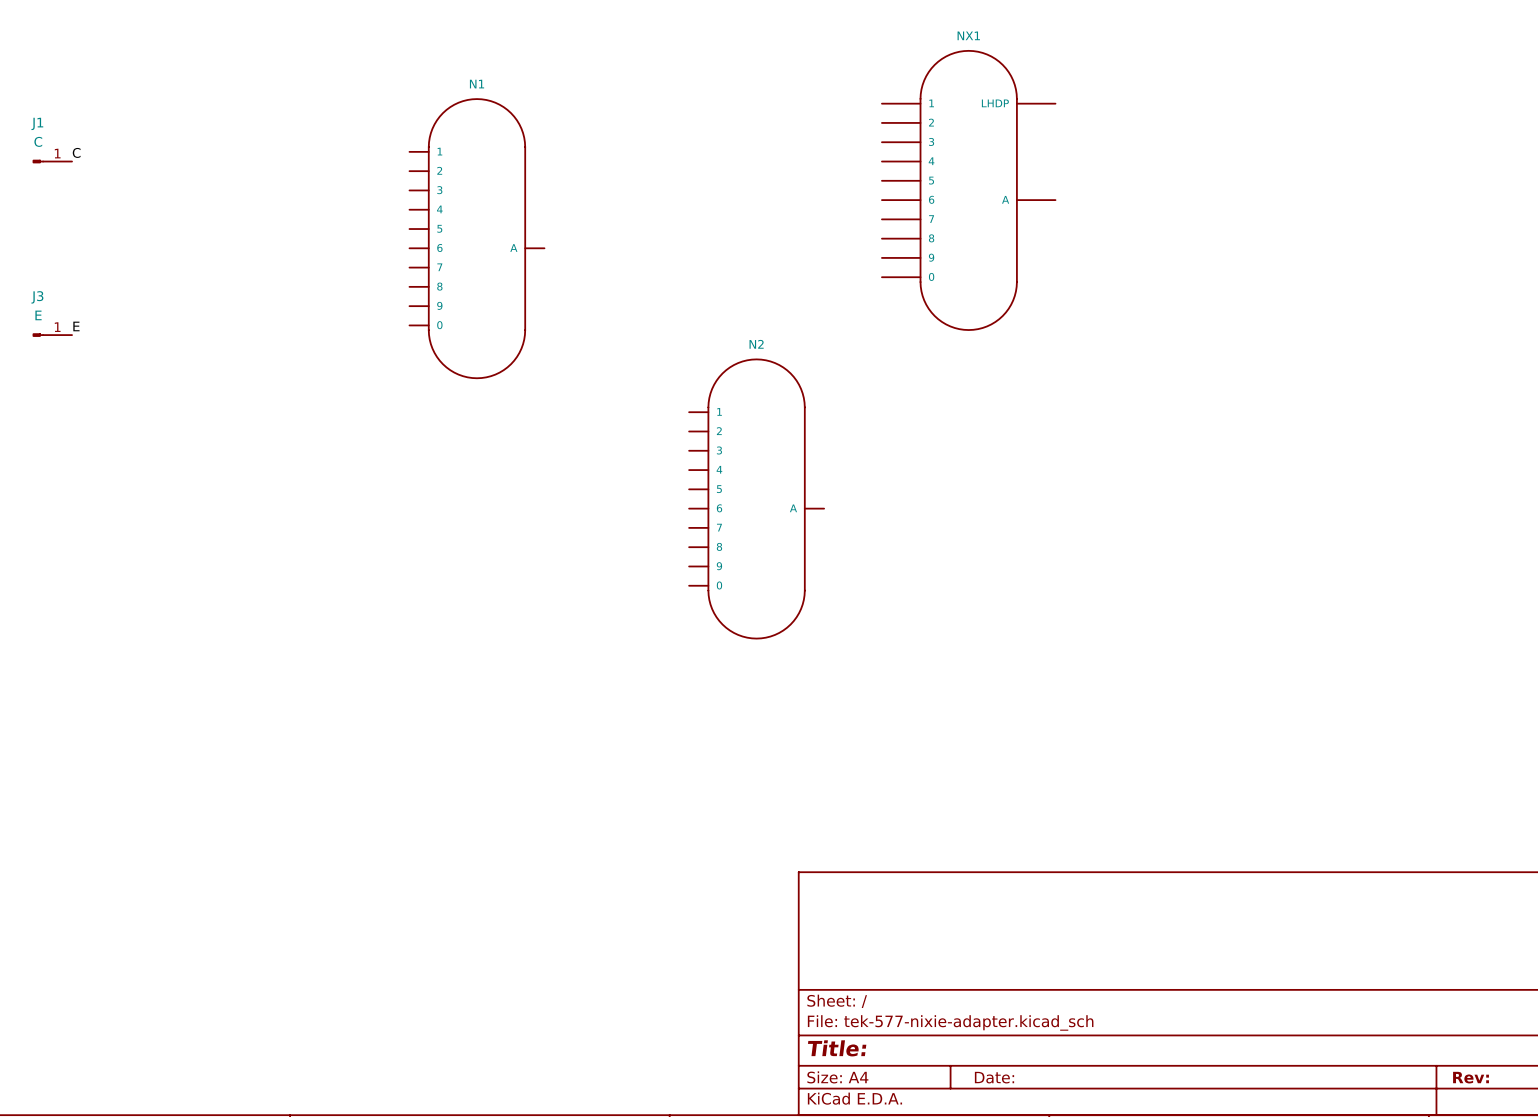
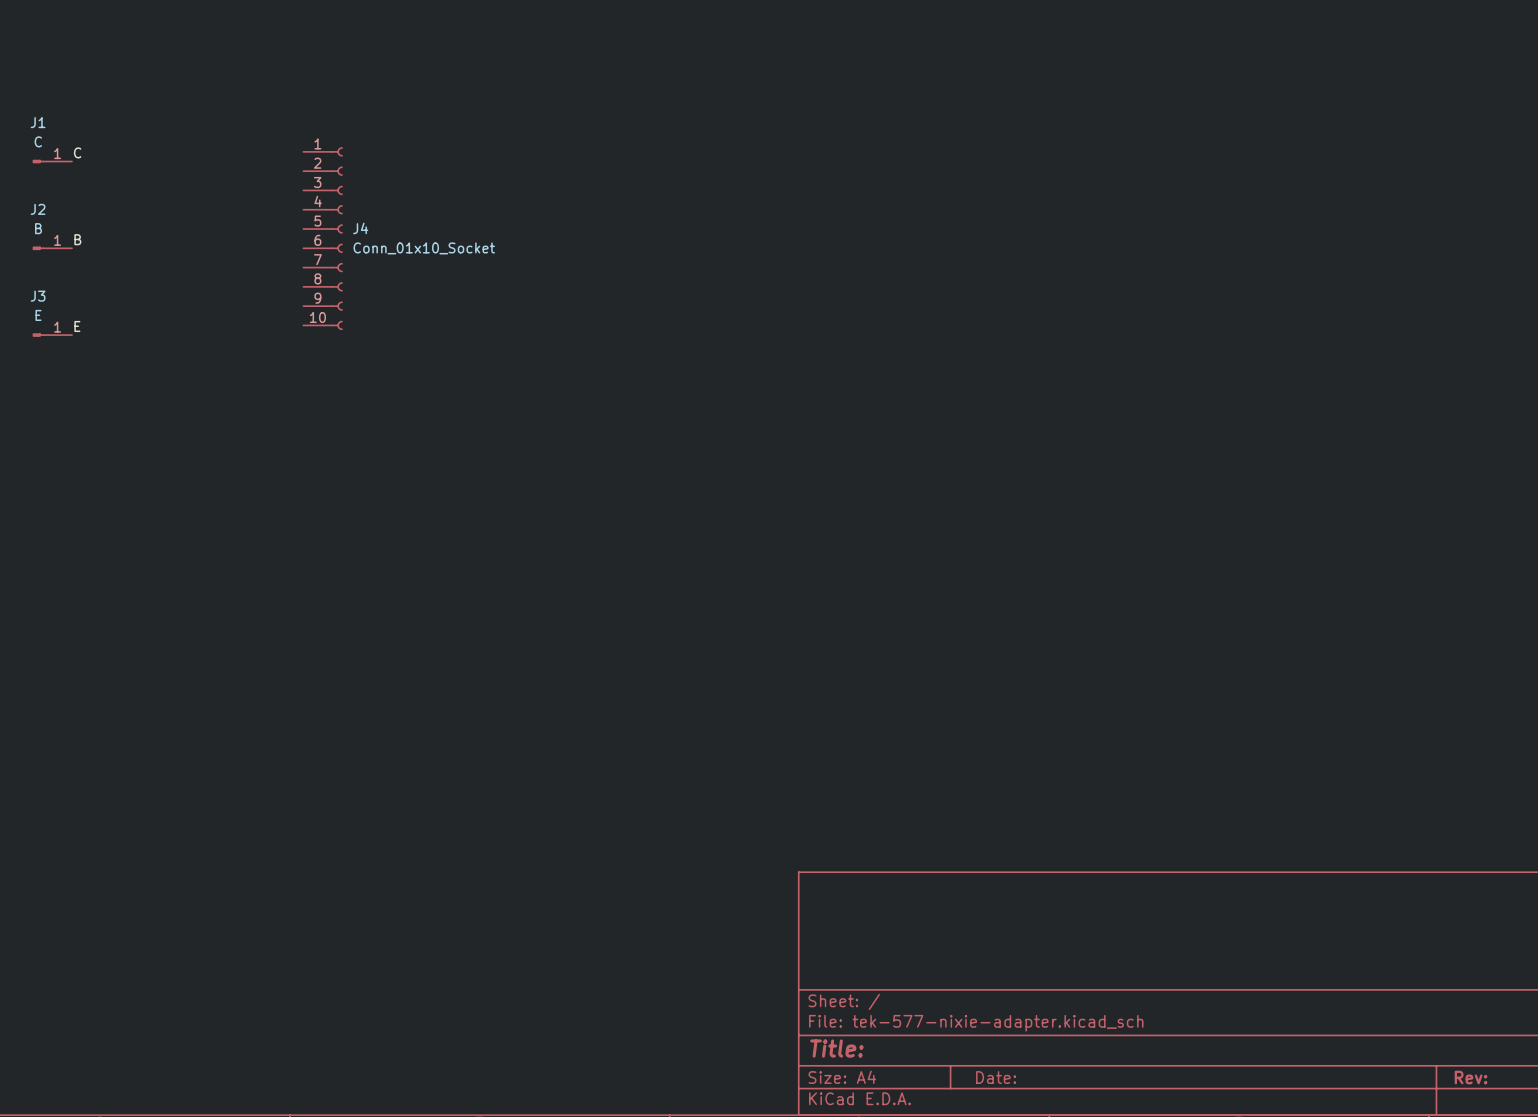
NX1: (968, 190) -> none
J4: none -> Conn_01x10_Socket (323, 238)
N1: (476, 238) -> none
label: none -> B (77, 239)
J2: none -> B (52, 248)
N2: (756, 498) -> none

